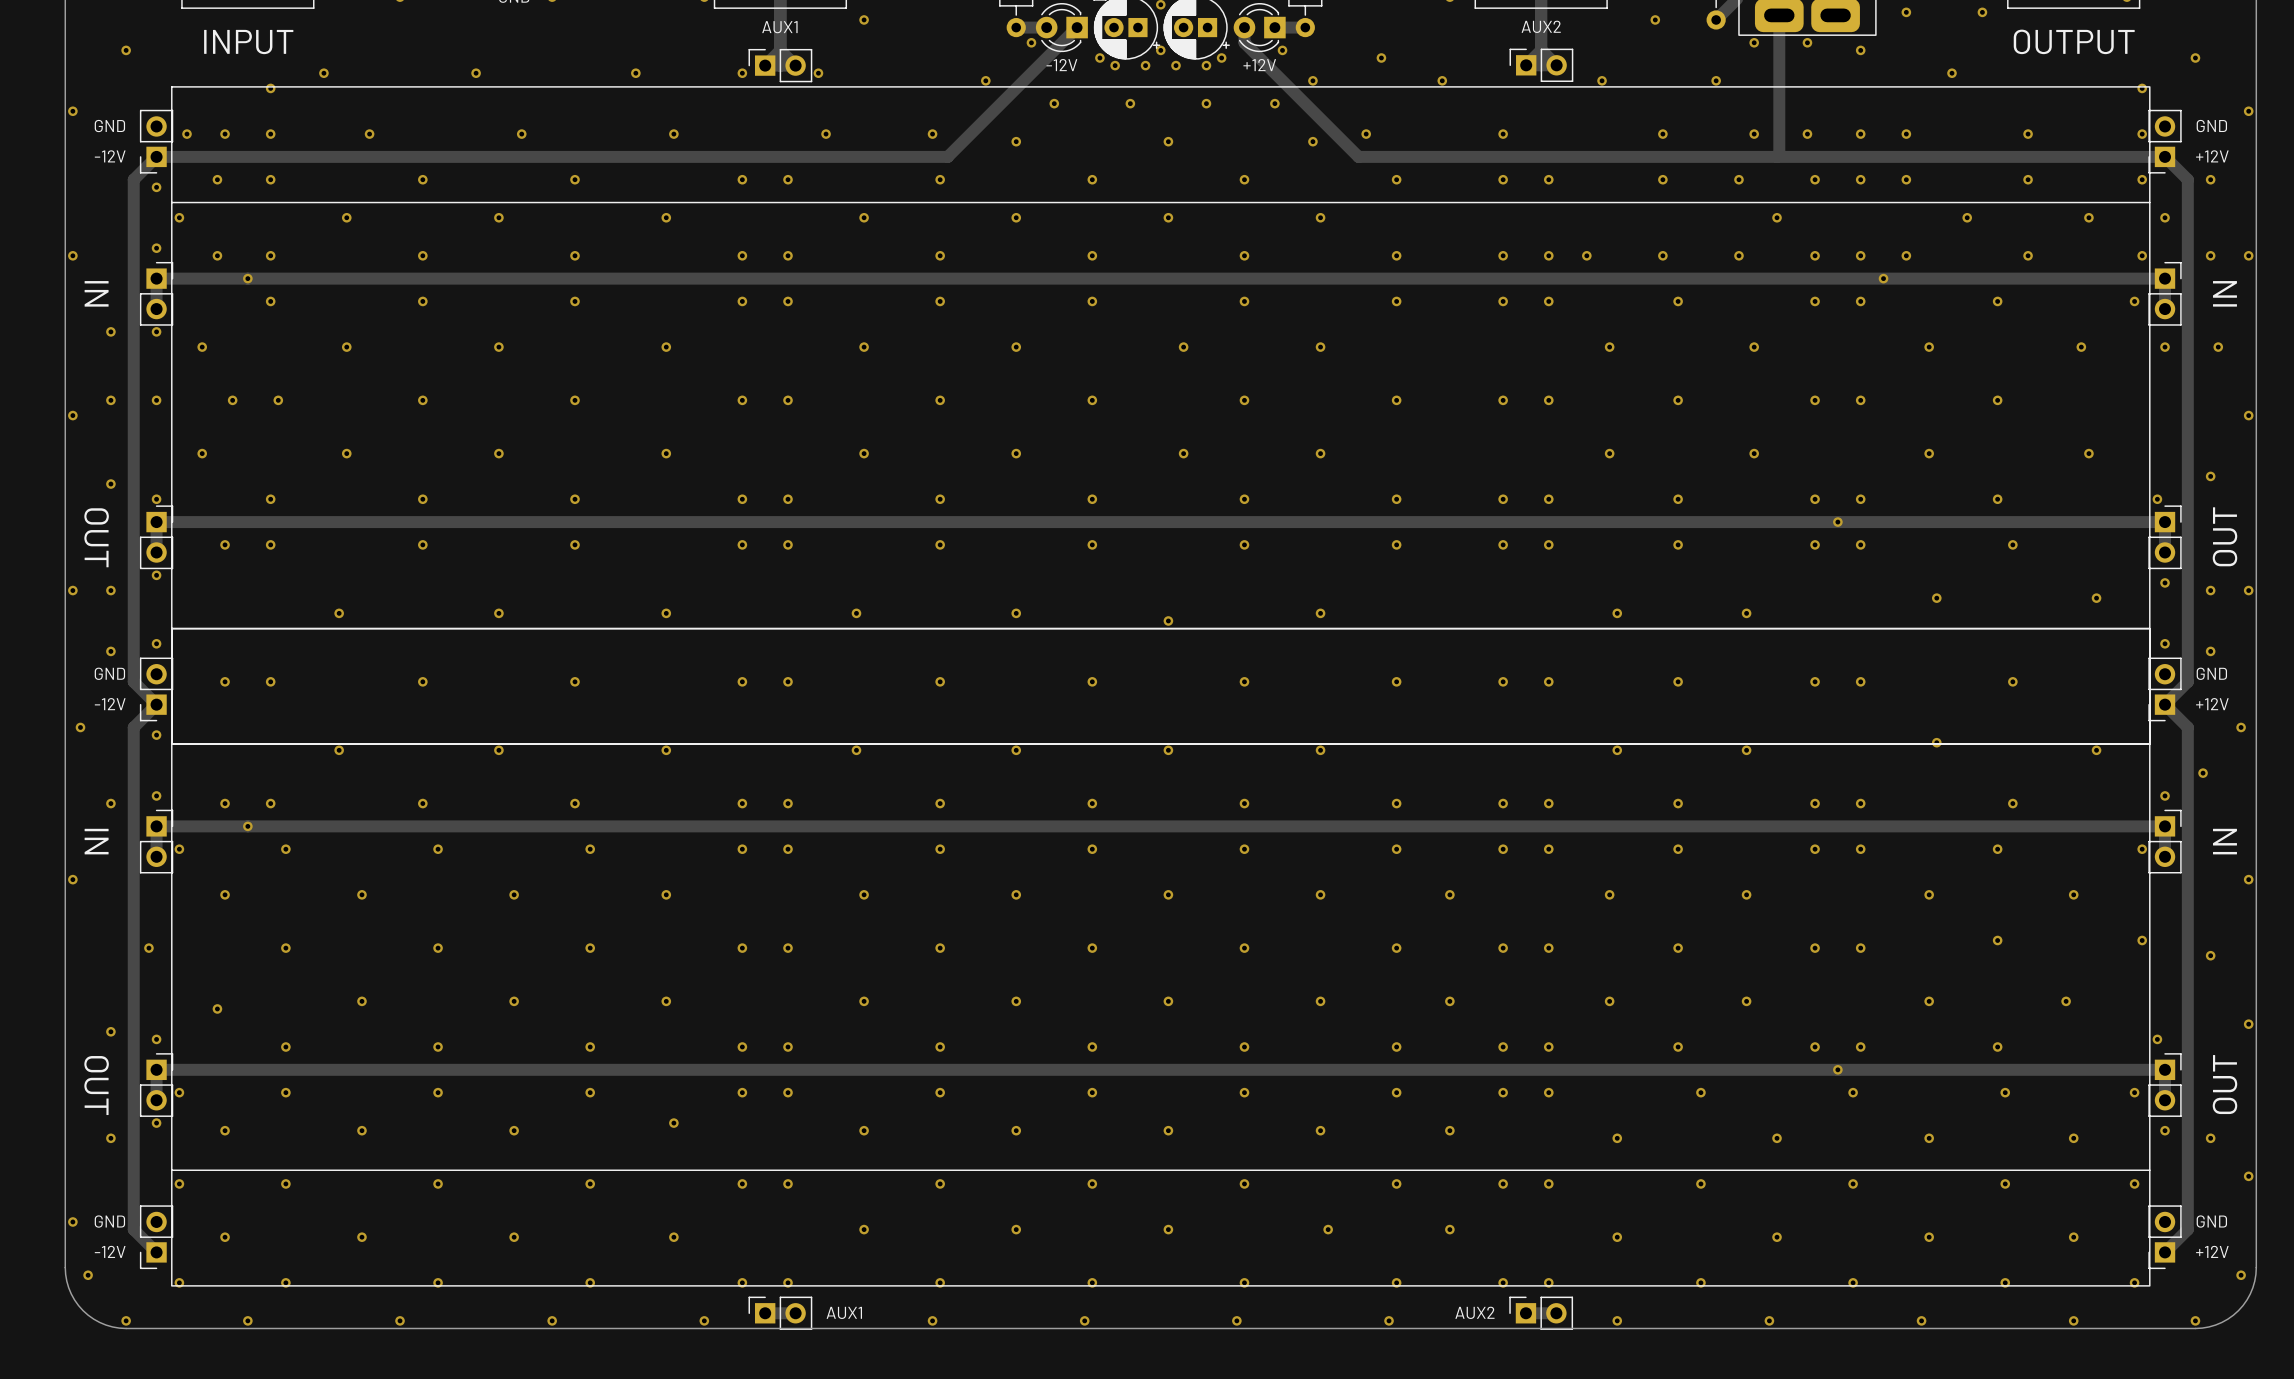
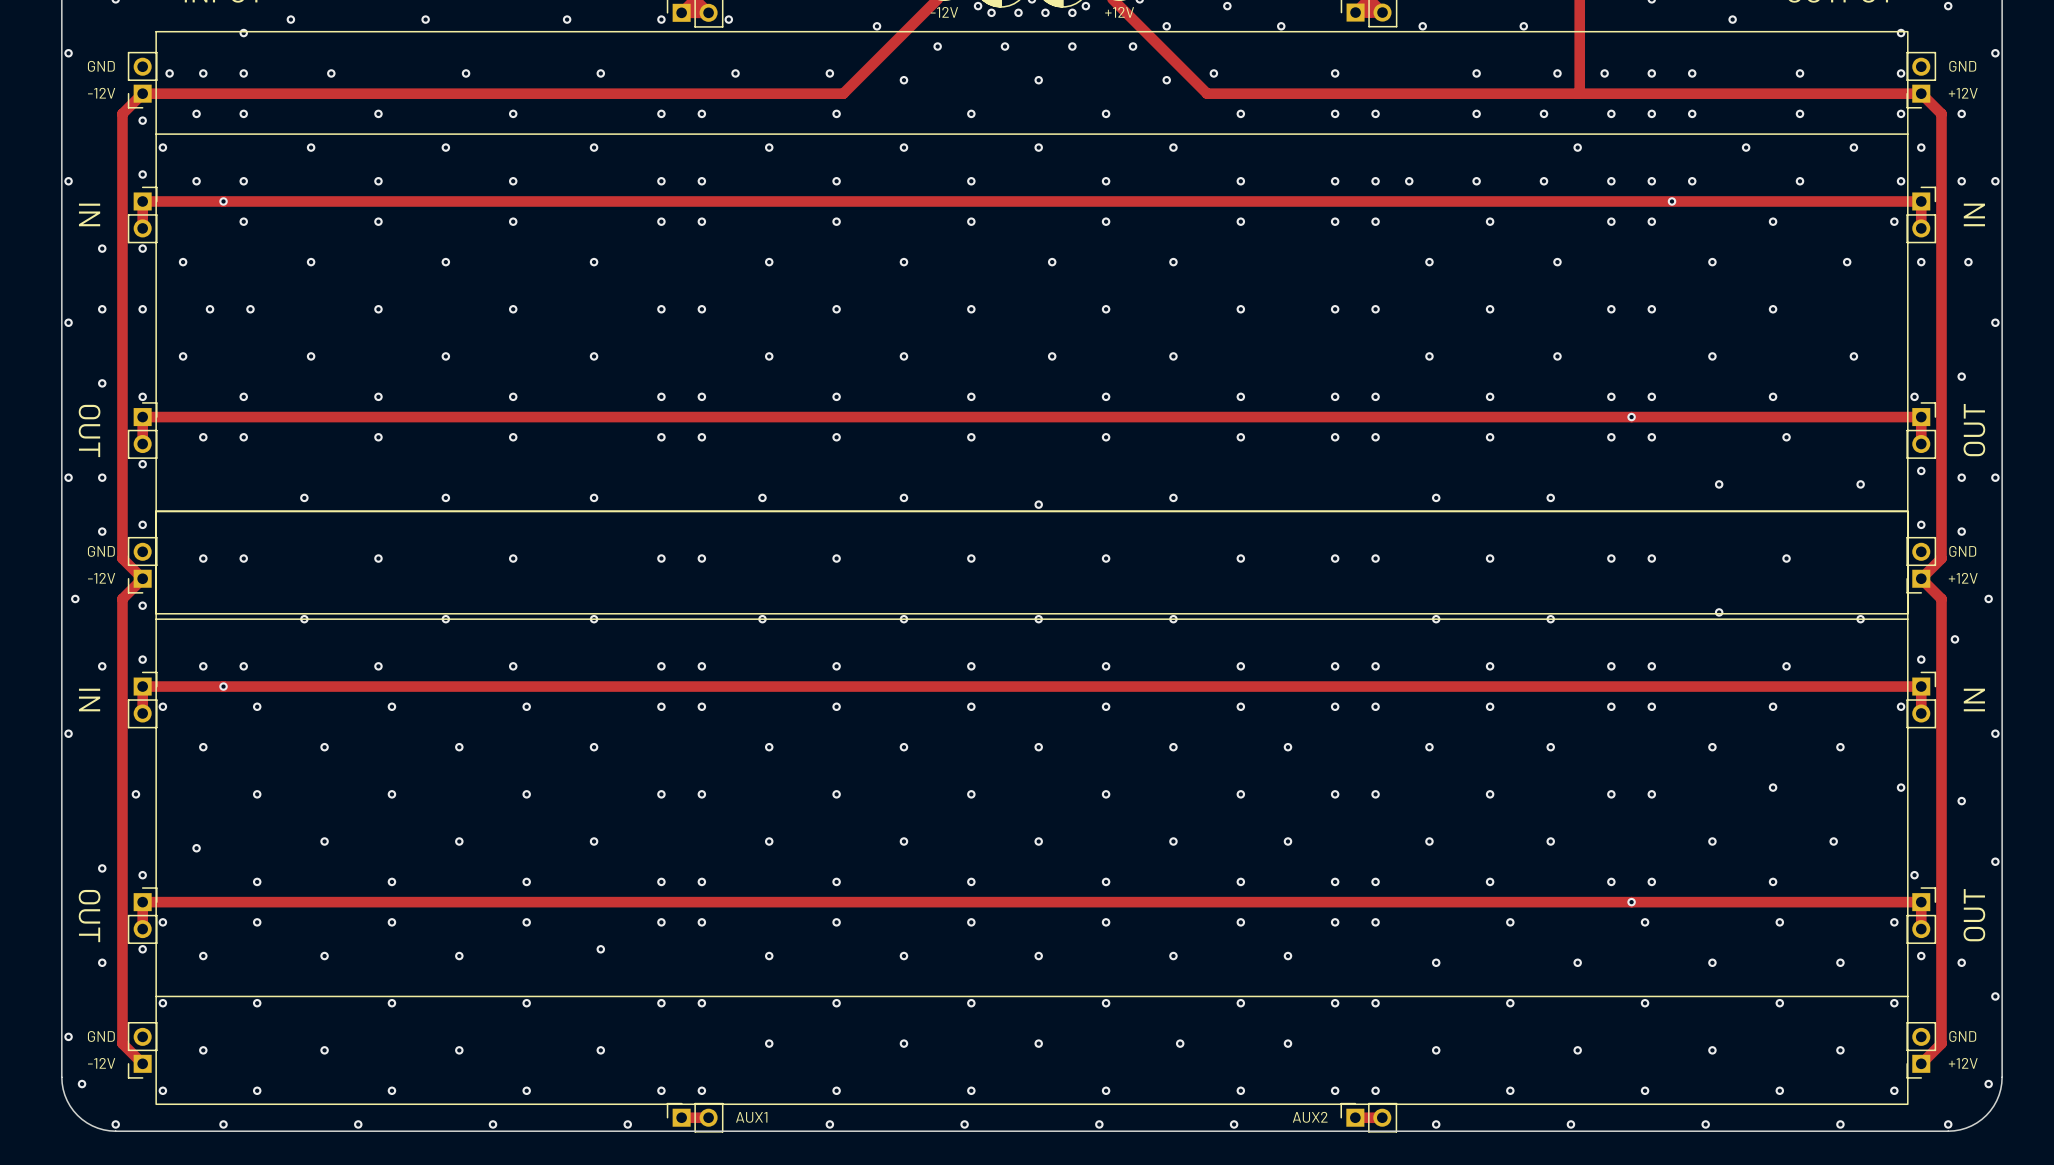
drawing shape: [171, 627, 2151, 1287] -> [155, 510, 1909, 1105]

